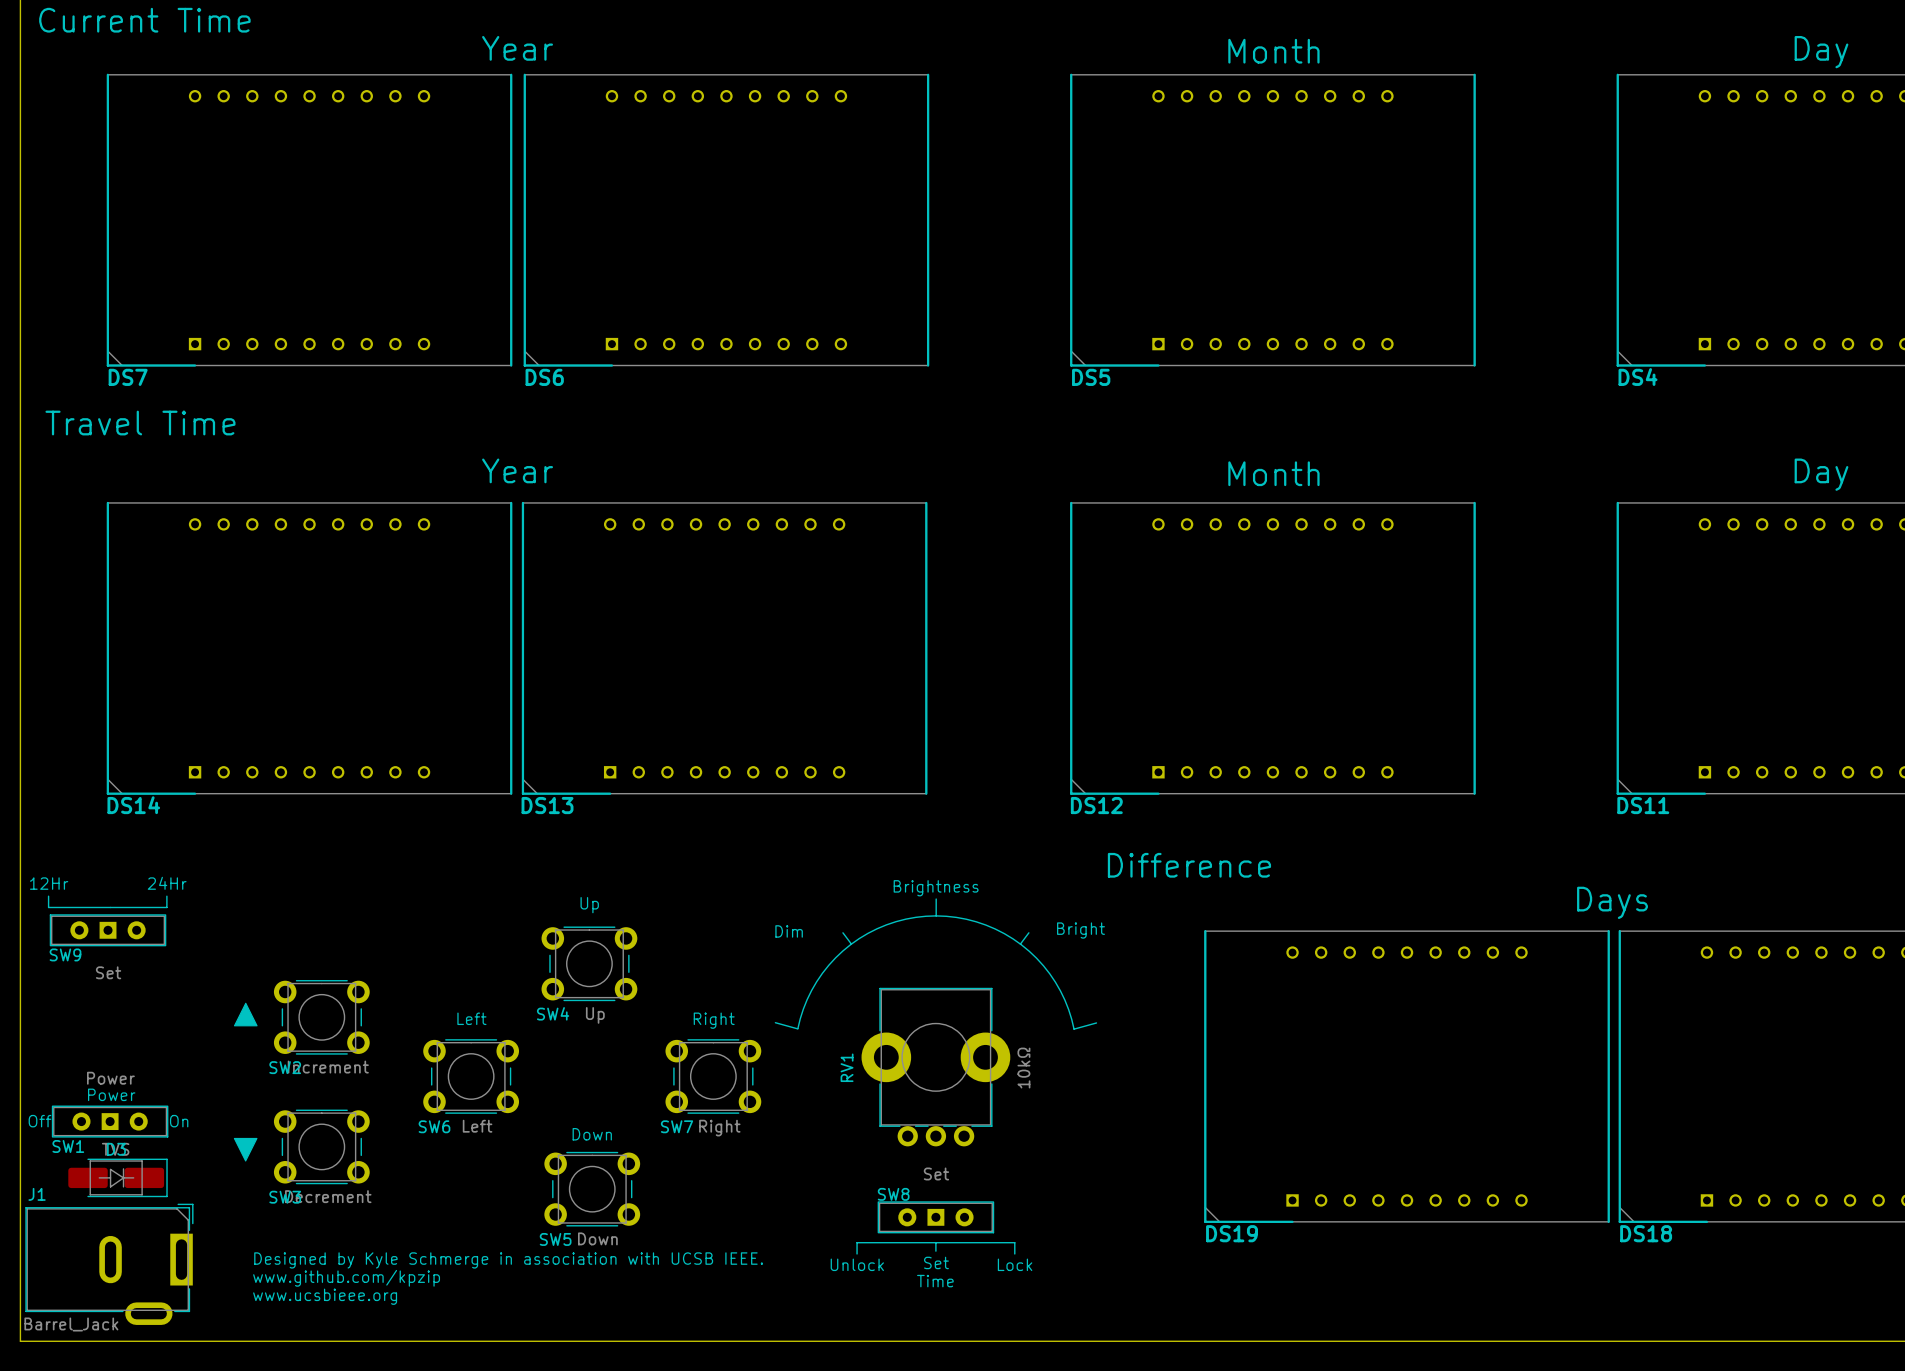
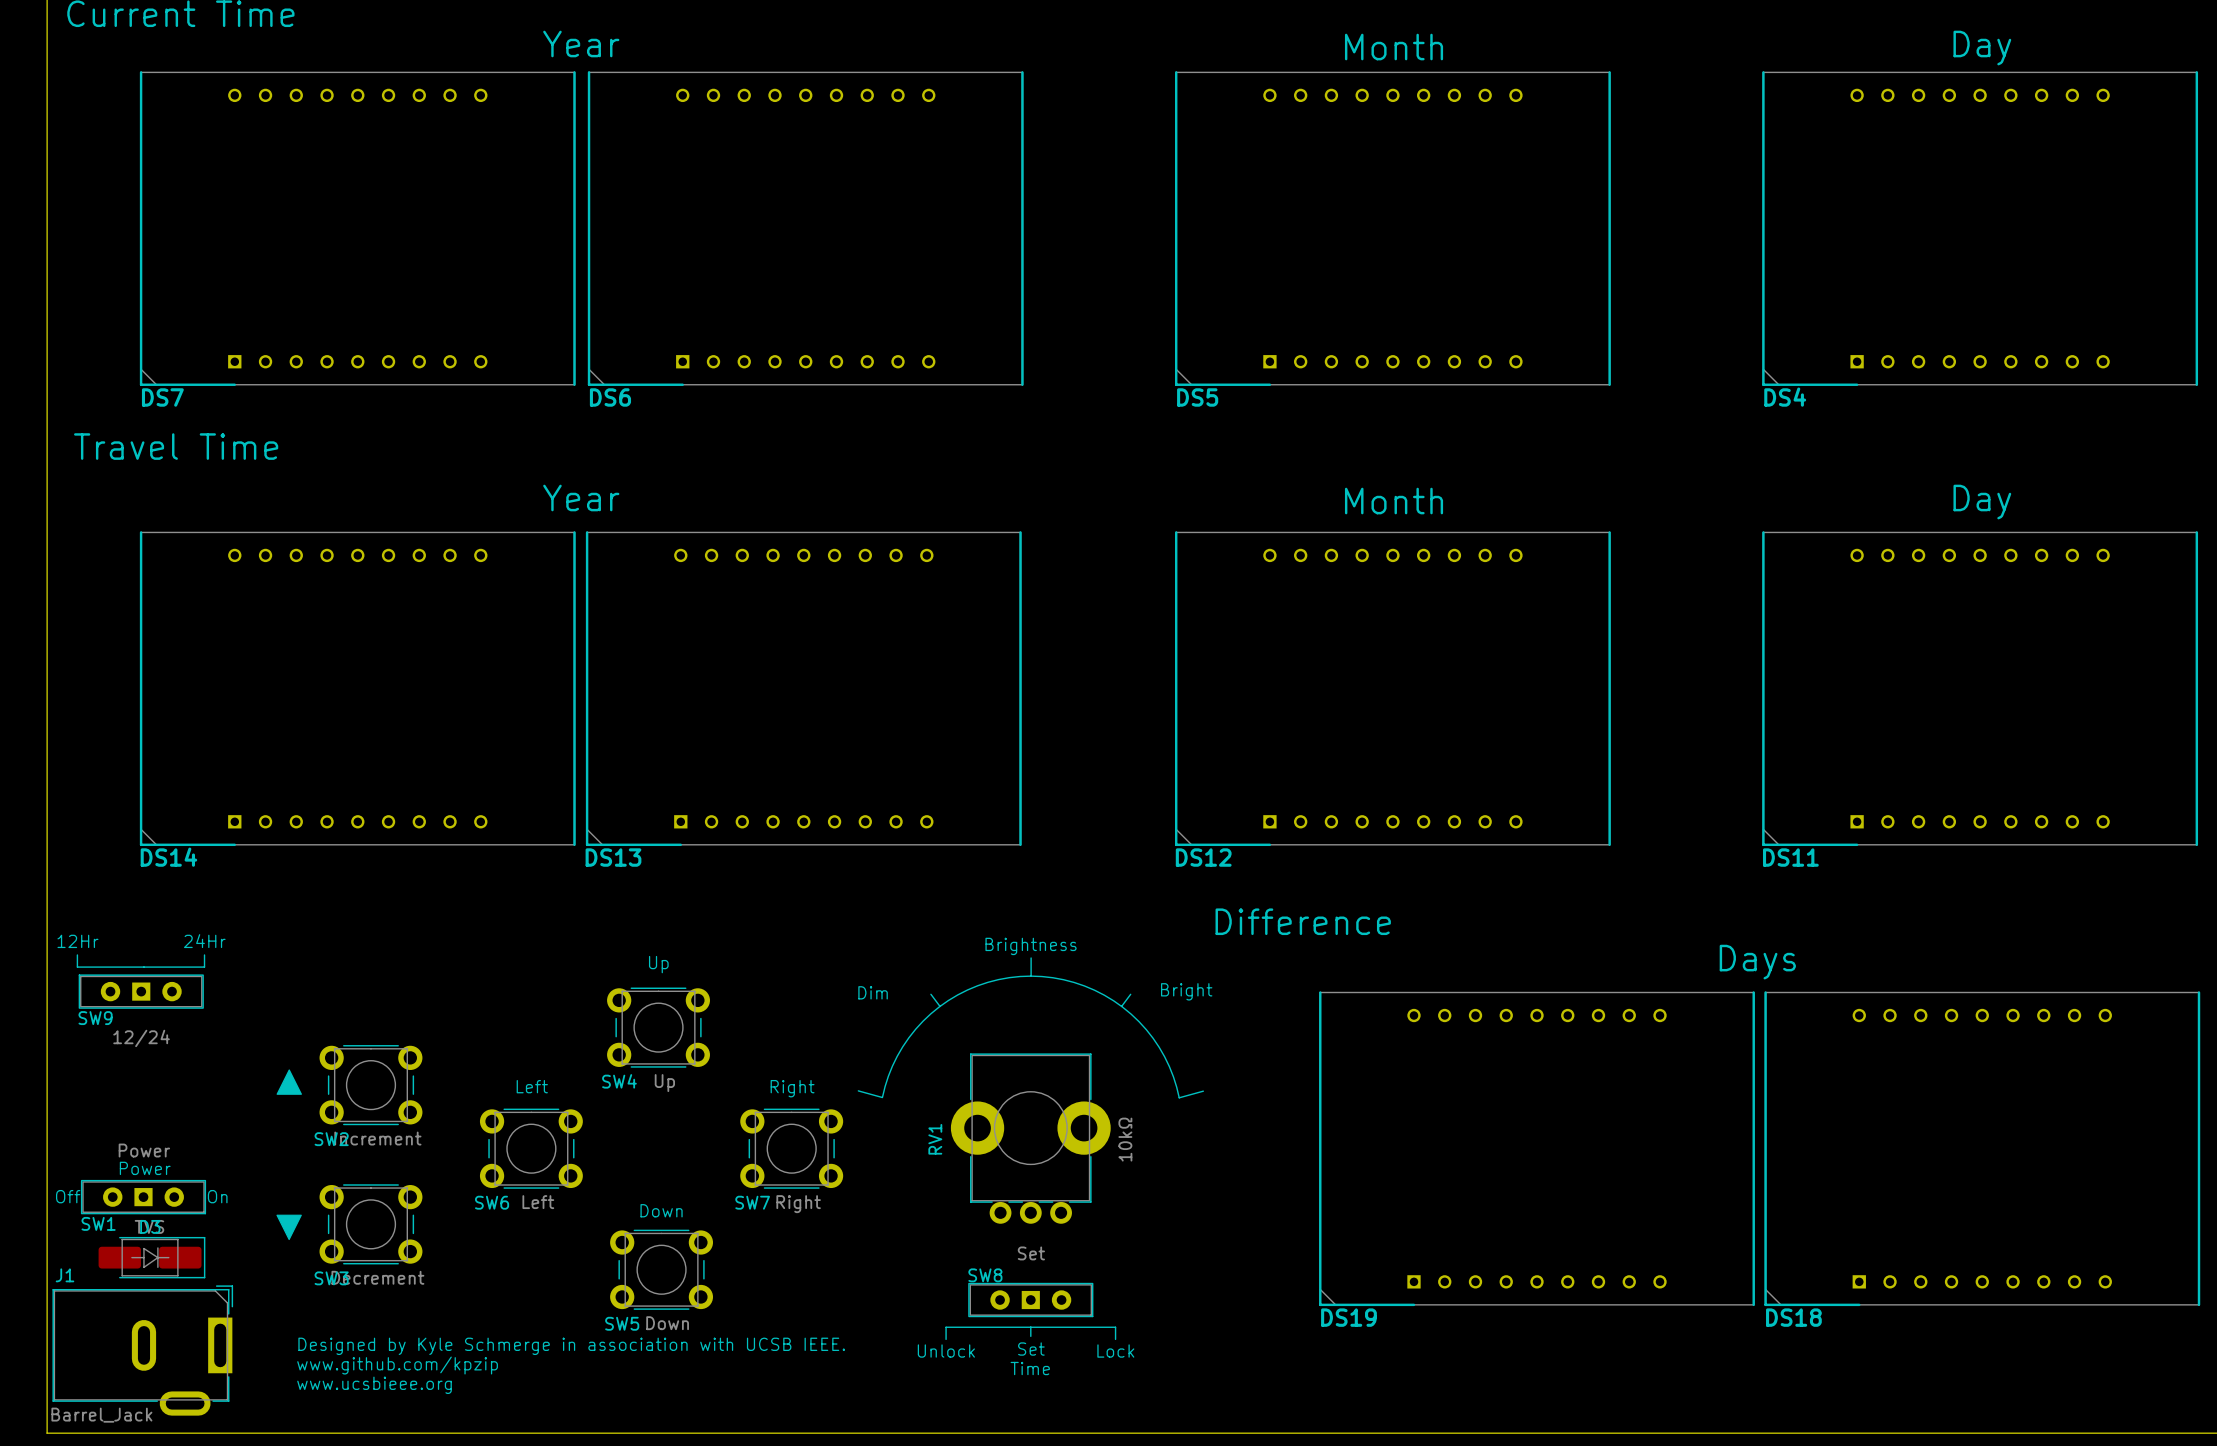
SW9 value: Set (108, 972) -> 12/24 (141, 1038)

